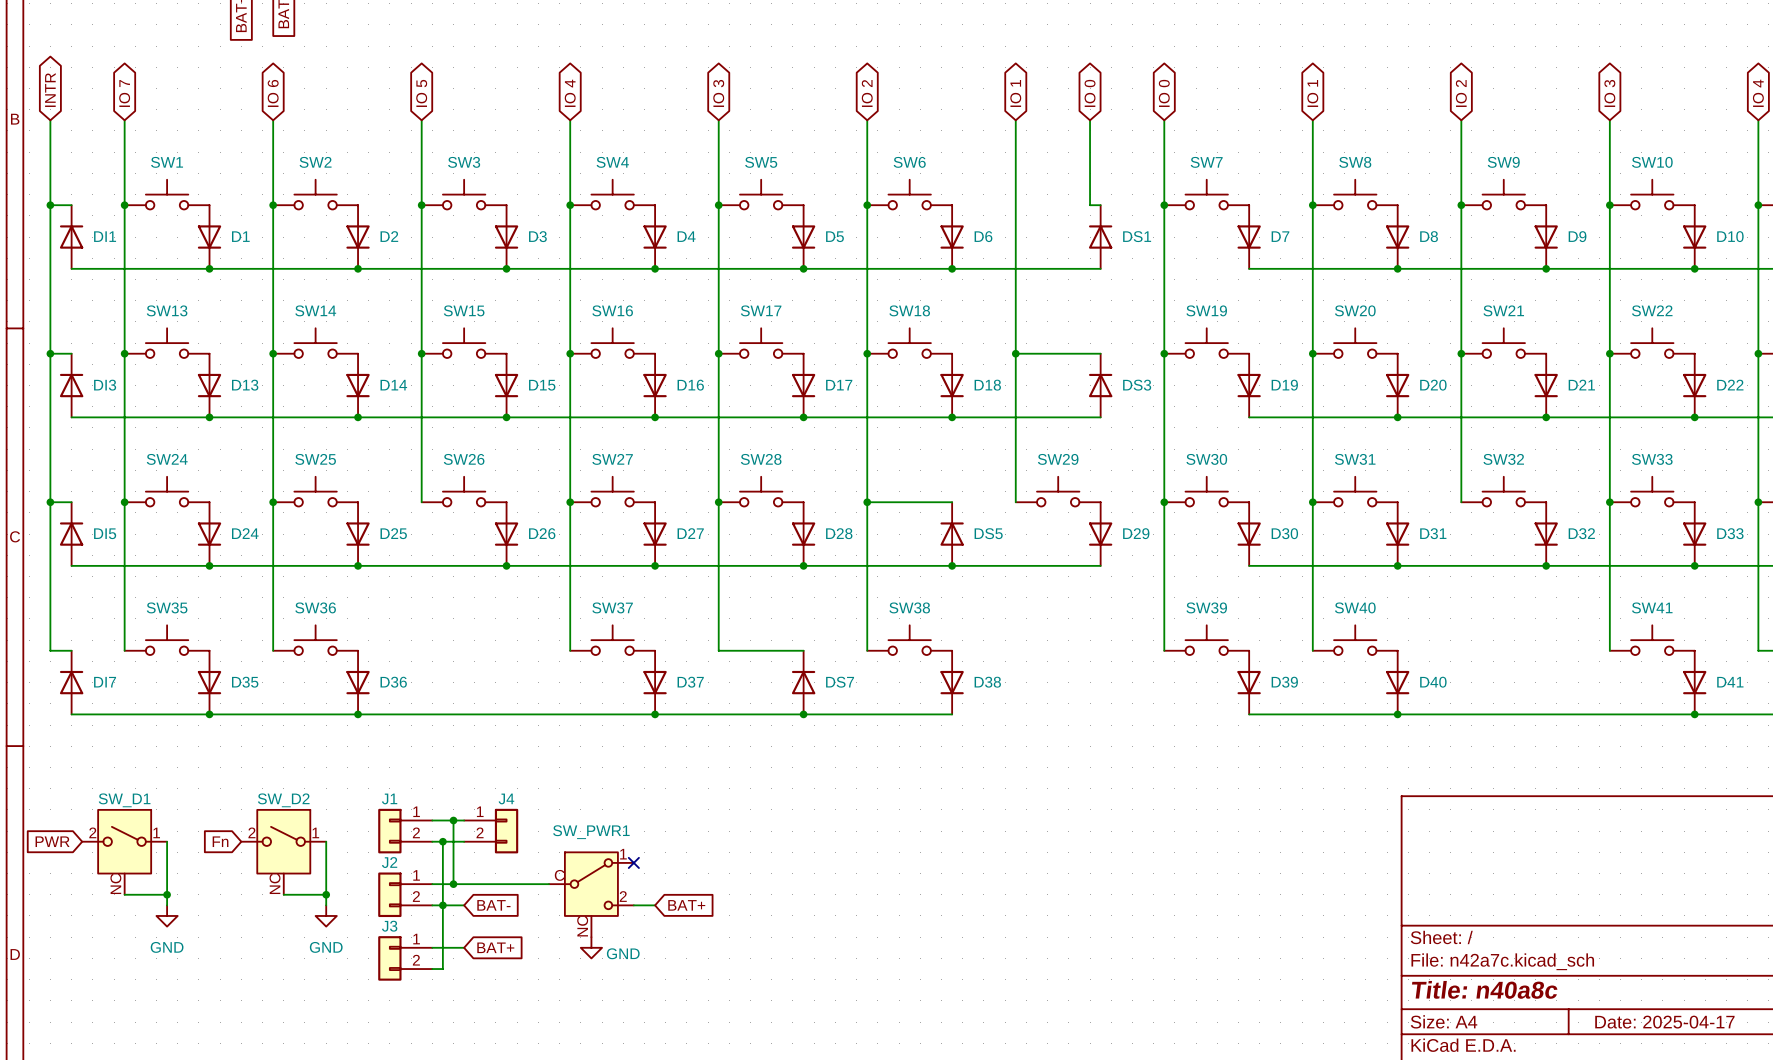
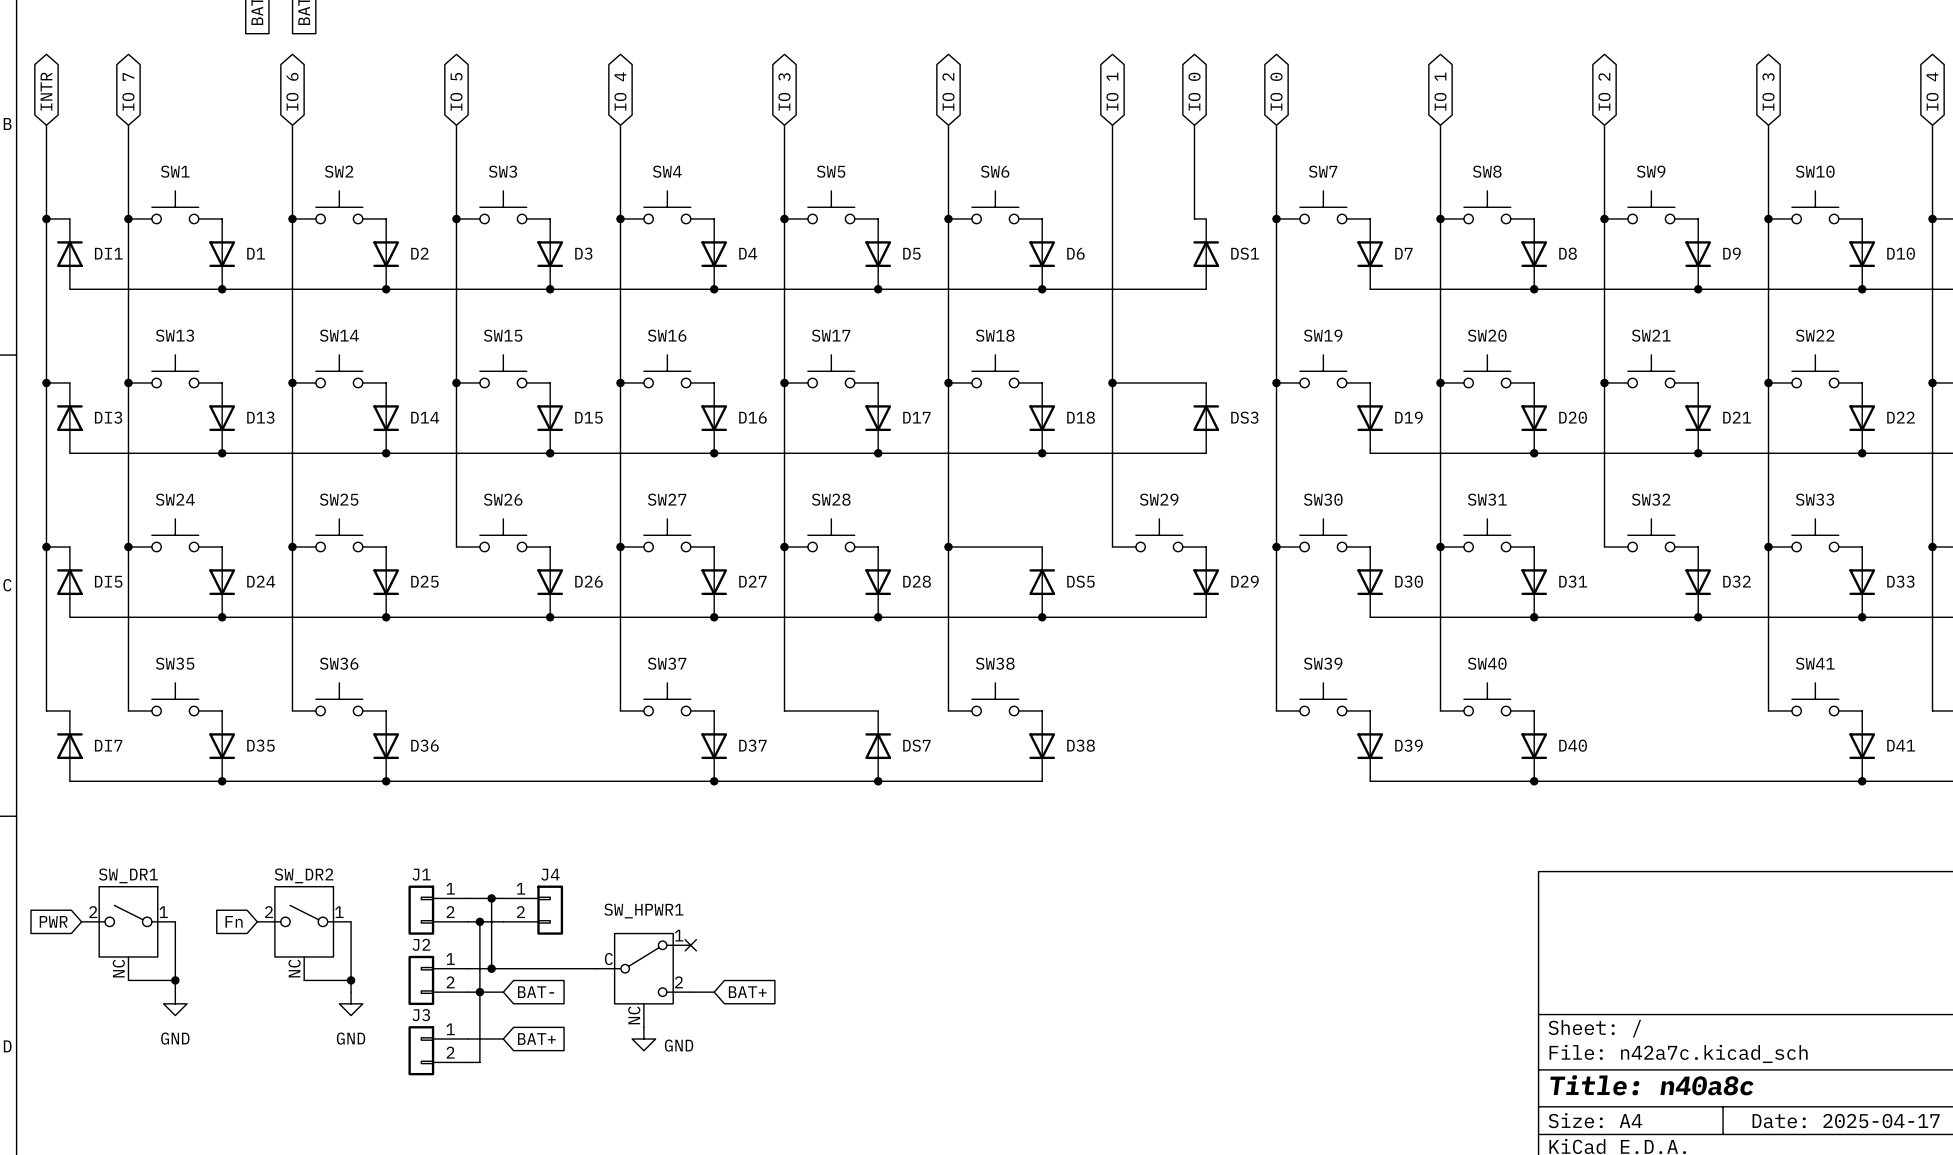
SW_D1 name: SW_D1 (124, 800) -> SW_DR1 (128, 875)
SW_D2 name: SW_D2 (283, 800) -> SW_DR2 (304, 875)
SW_PWR1 name: SW_PWR1 (591, 832) -> SW_HPWR1 (643, 911)

